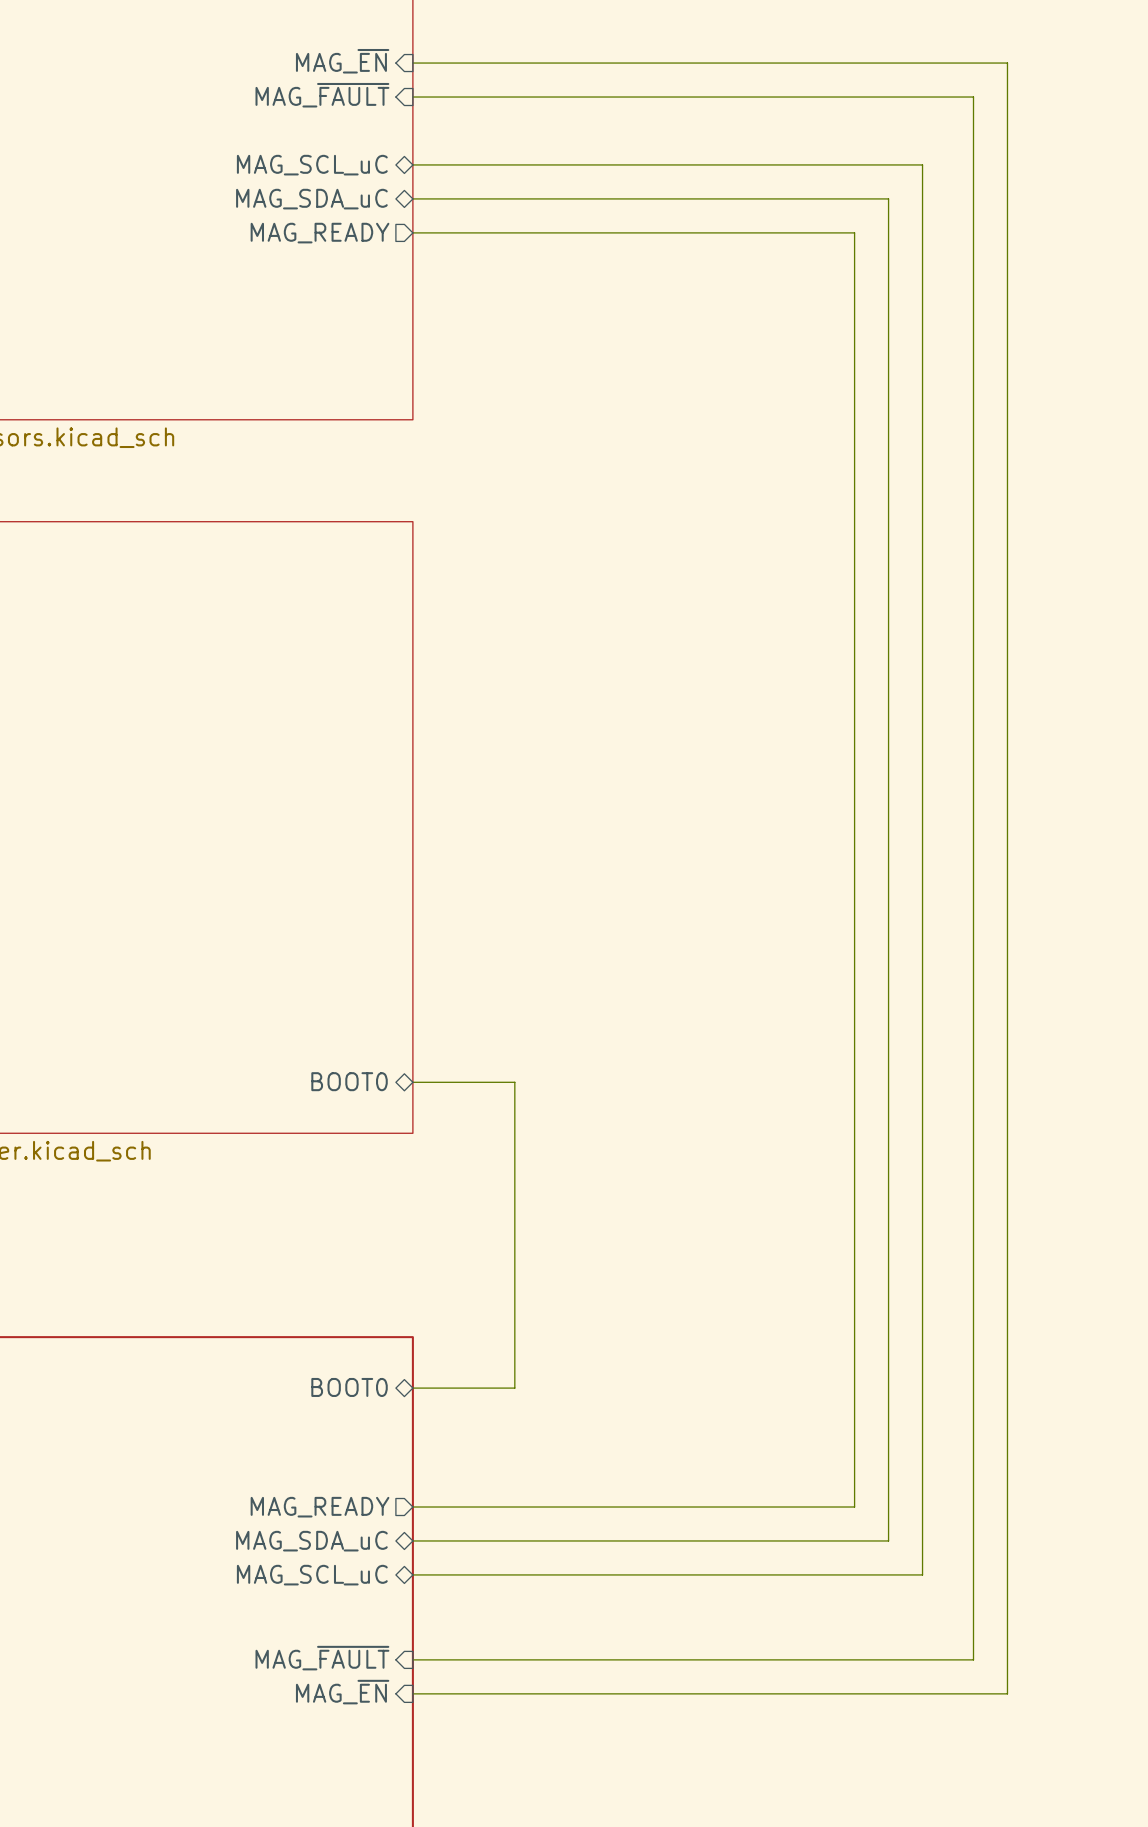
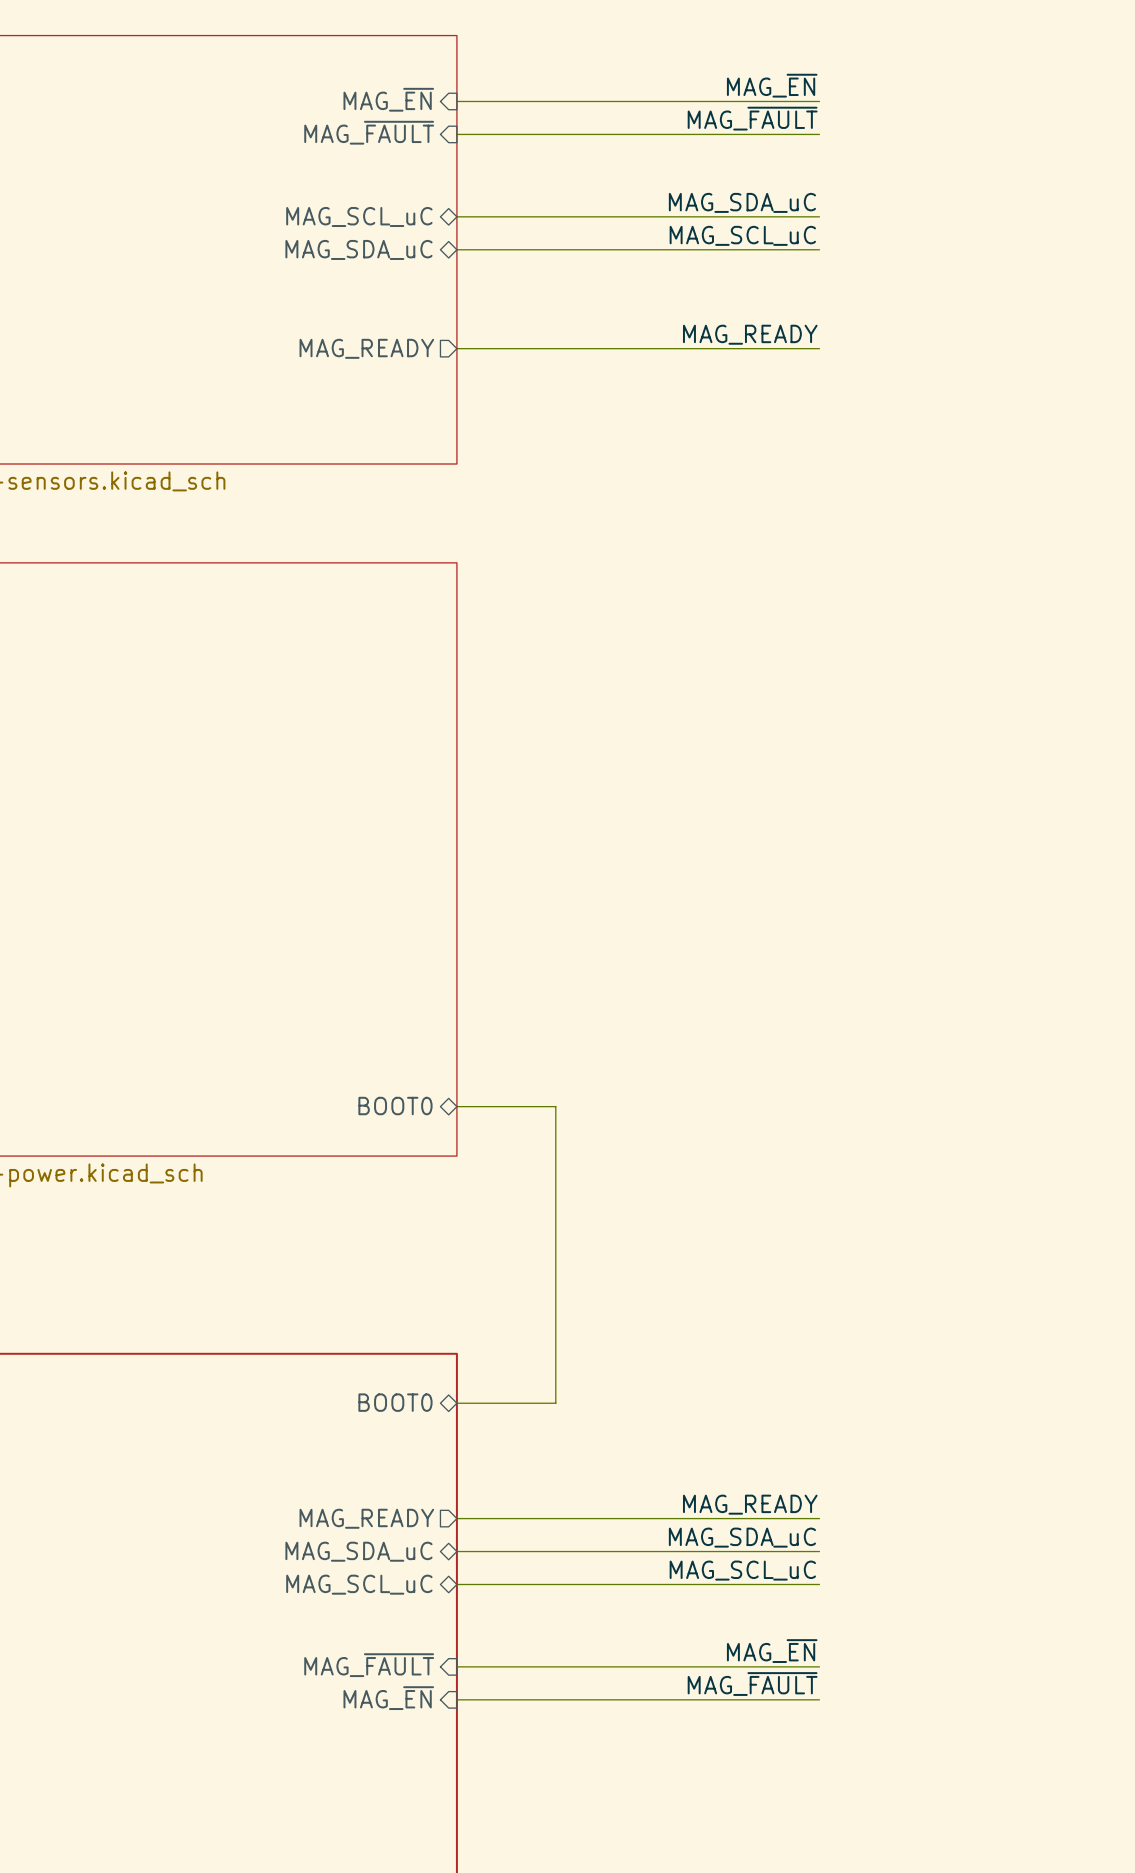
label: none -> MAG_~{EN} (772, 85)
wire: none -> (456, 101) (819, 101)
sheet pin position: MAG_~{EN} (342, 61) -> MAG_~{EN} (388, 99)
wire: (412, 63) (1007, 63) (1007, 1693) (786, 1693) -> none
label: none -> MAG_~{FAULT} (752, 118)
wire: none -> (456, 134) (819, 134)
sheet pin position: MAG_~{FAULT} (322, 95) -> MAG_~{FAULT} (369, 132)
wire: (412, 97) (973, 97) (973, 1659) (786, 1659) -> none
label: none -> MAG_SDA_uC (742, 202)
wire: (786, 164) (922, 164) (922, 1574) (786, 1574) -> none
label: none -> MAG_SCL_uC (742, 235)
wire: (786, 198) (888, 198) (888, 1540) (786, 1540) -> none
wire: (412, 232) (854, 232) (854, 1507) (786, 1507) -> none
sheet pin position: MAG_READY (320, 233) -> MAG_READY (366, 348)
label: none -> MAG_READY (750, 334)
wire: none -> (456, 348) (819, 348)
label: none -> MAG_READY (750, 1504)
label: none -> MAG_SDA_uC (742, 1537)
label: none -> MAG_SCL_uC (742, 1570)
label: none -> MAG_~{EN} (772, 1651)
label: none -> MAG_~{FAULT} (752, 1684)

